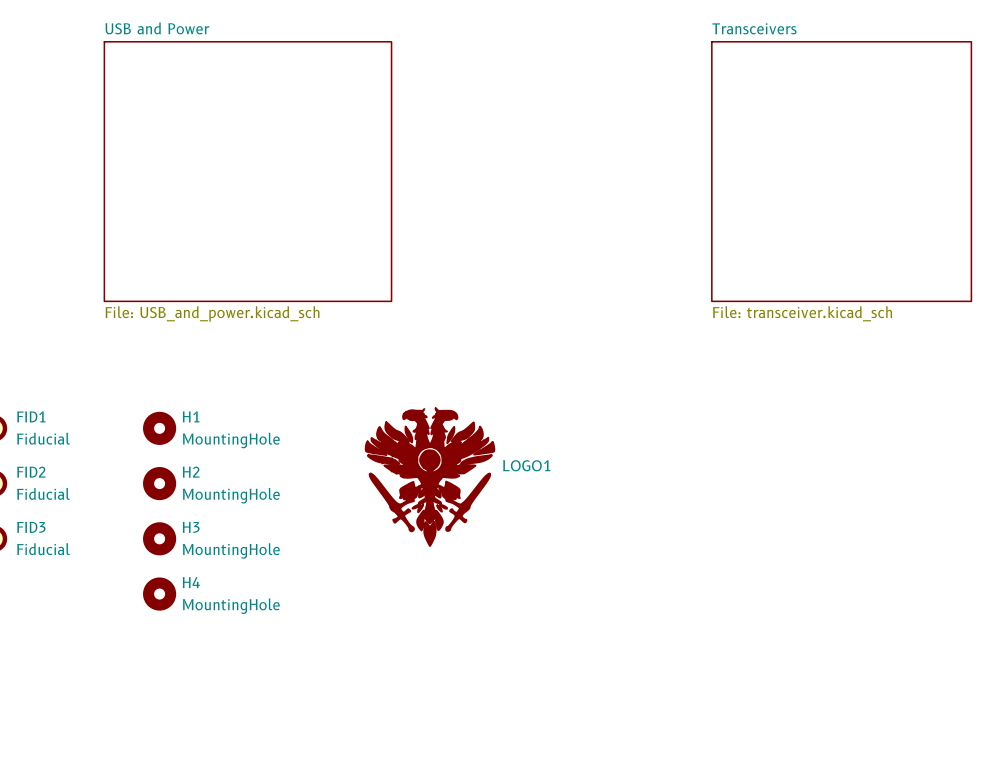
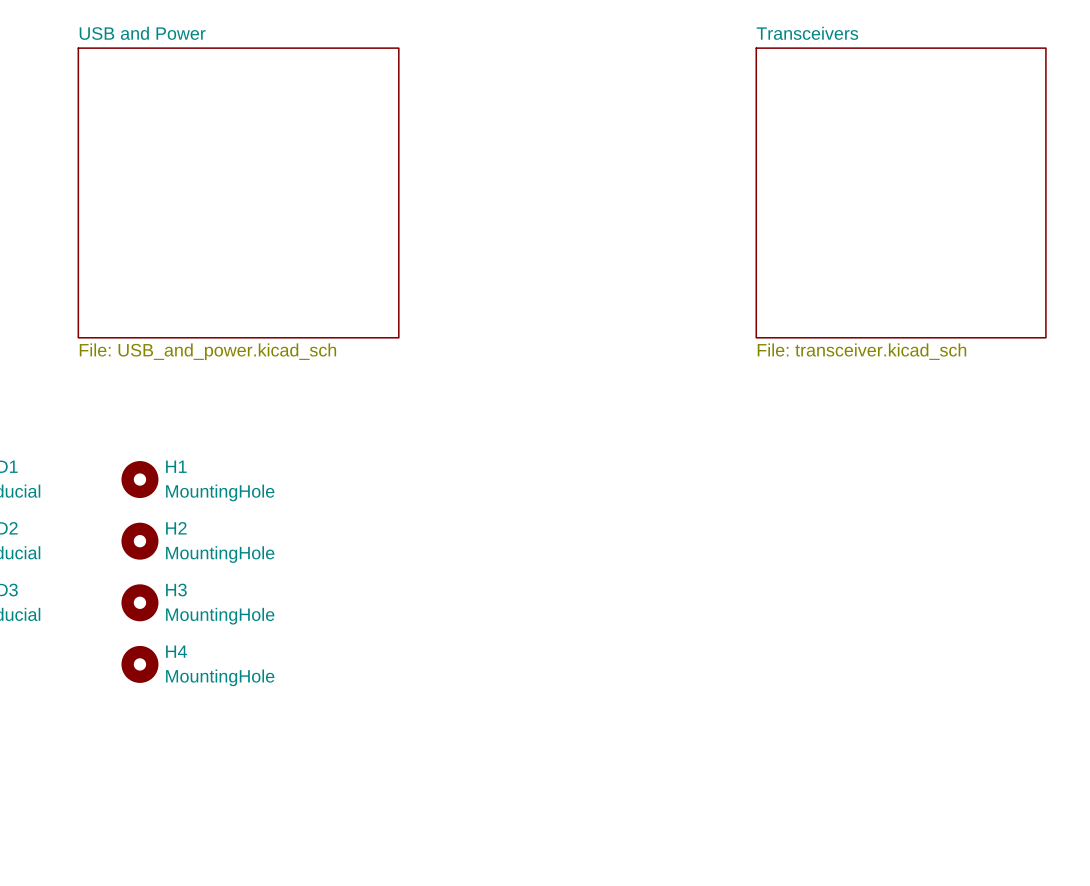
LOGO1: (430, 477) -> none

